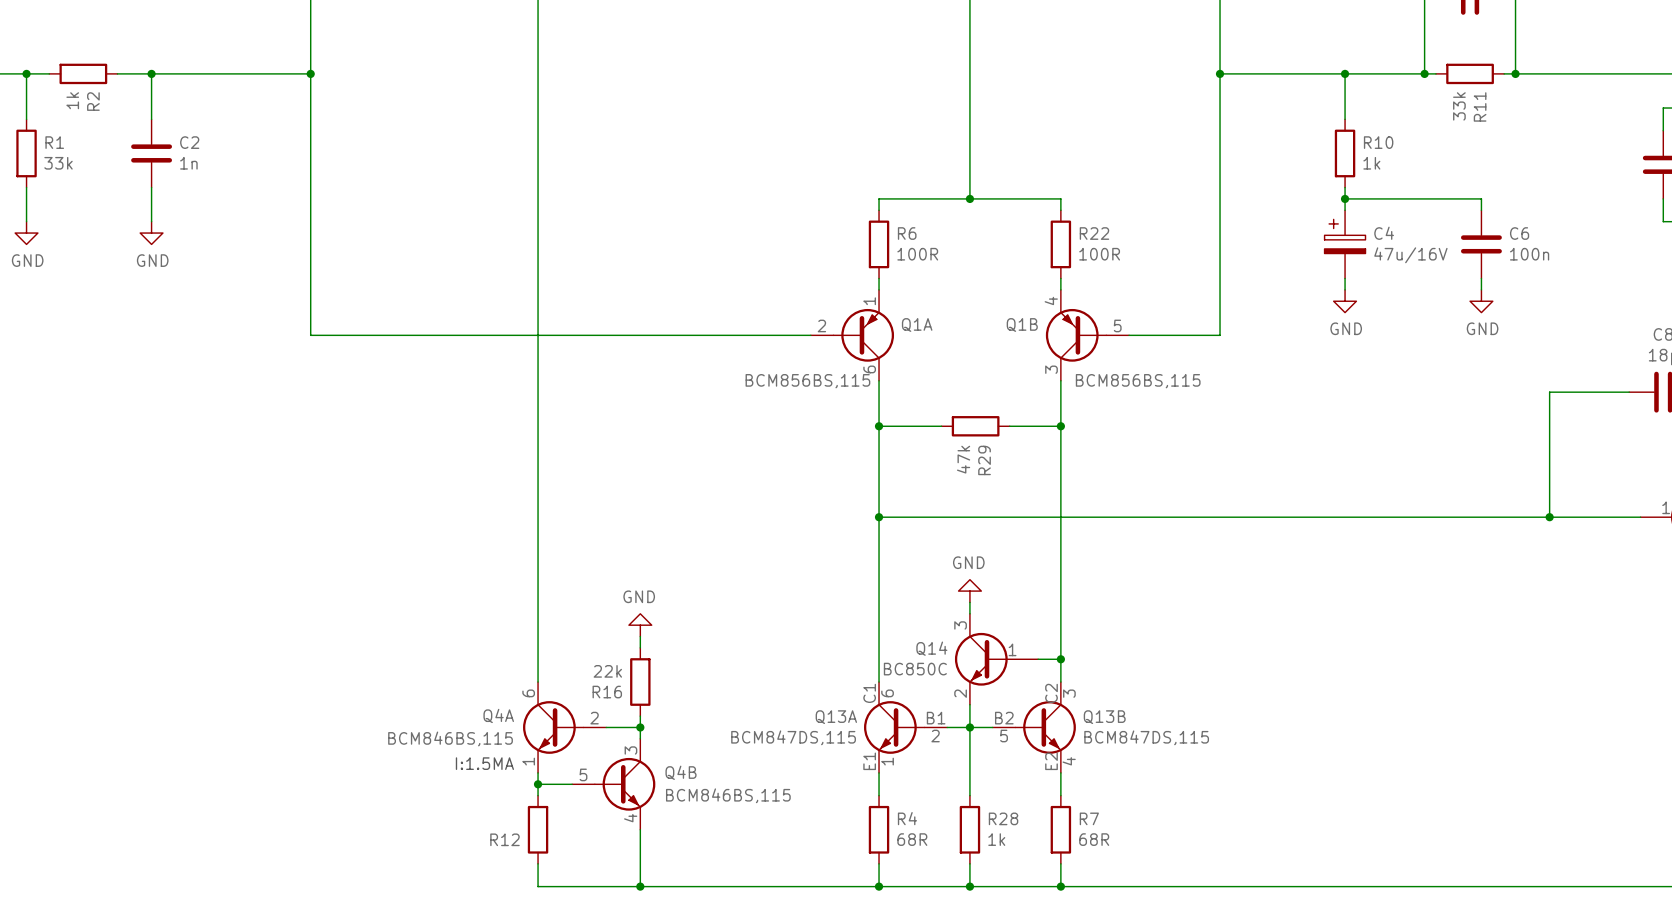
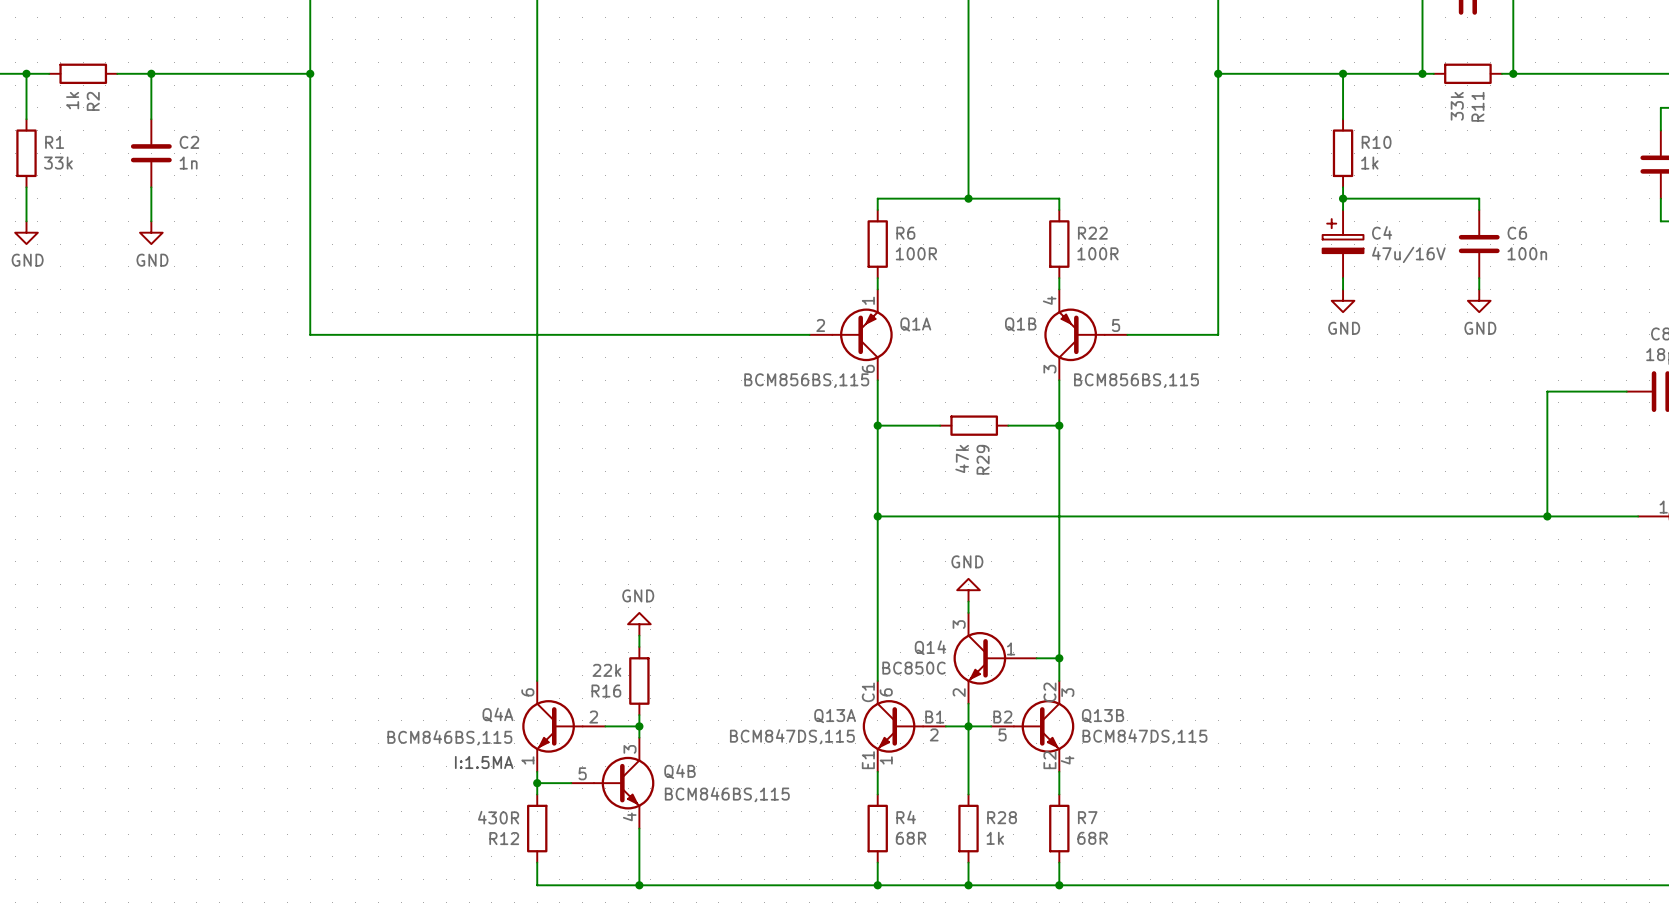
R12 value: none -> 430R (498, 817)

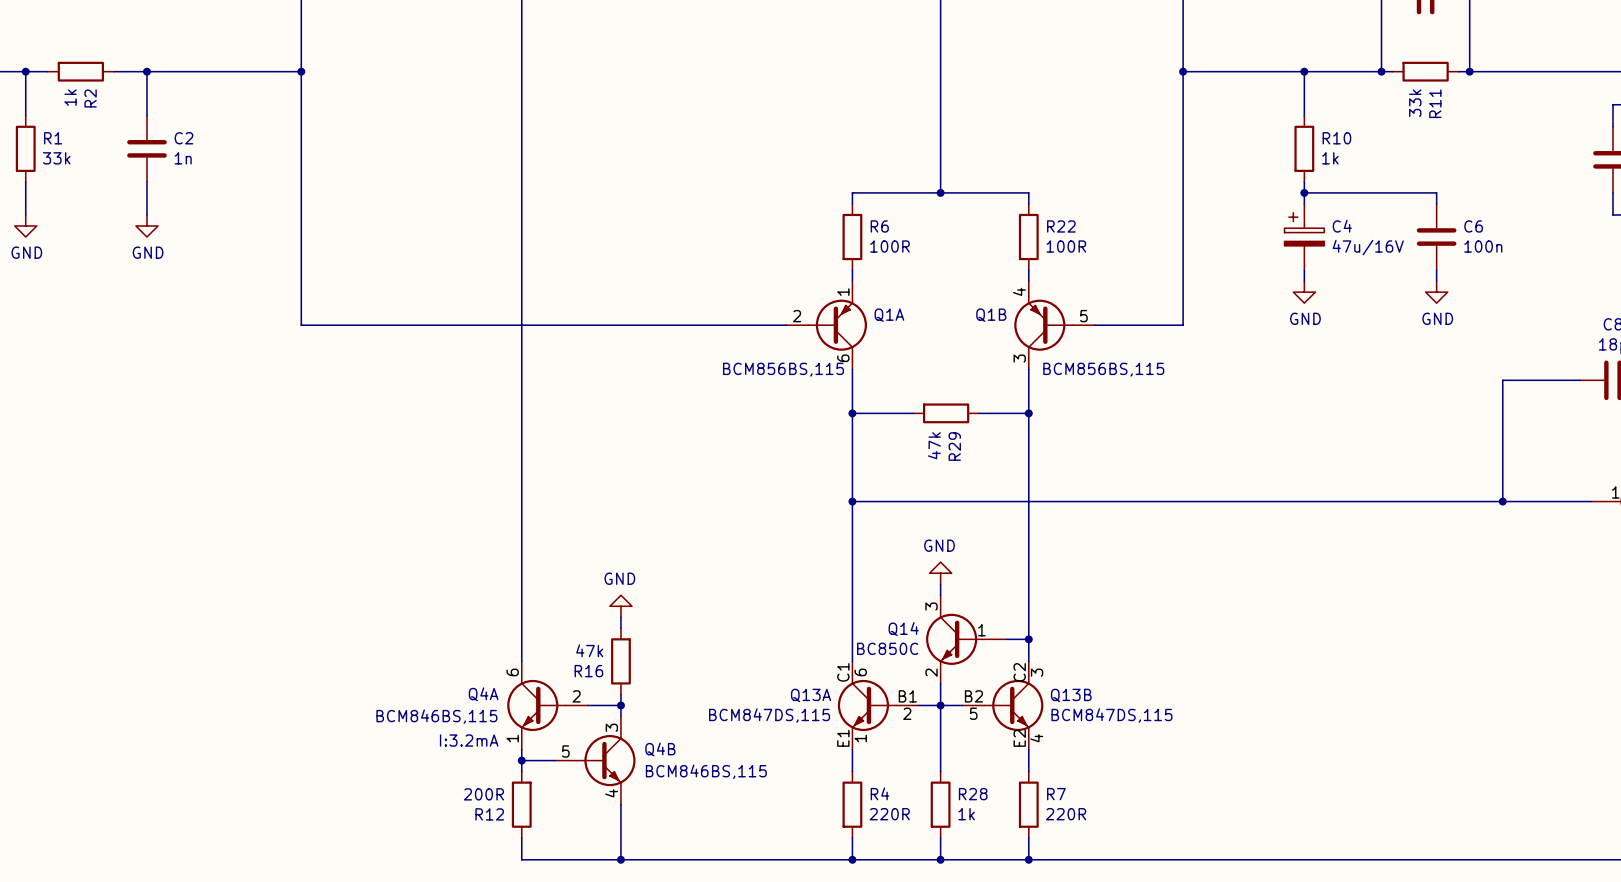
R16 value: 22k (606, 670) -> 47k (589, 650)
text: I:1.5MA (484, 762) -> I:3.2mA (469, 740)
R12 value: 430R (498, 817) -> 200R (483, 794)
R4 value: 68R (910, 838) -> 220R (889, 814)
R7 value: 68R (1092, 838) -> 220R (1066, 814)

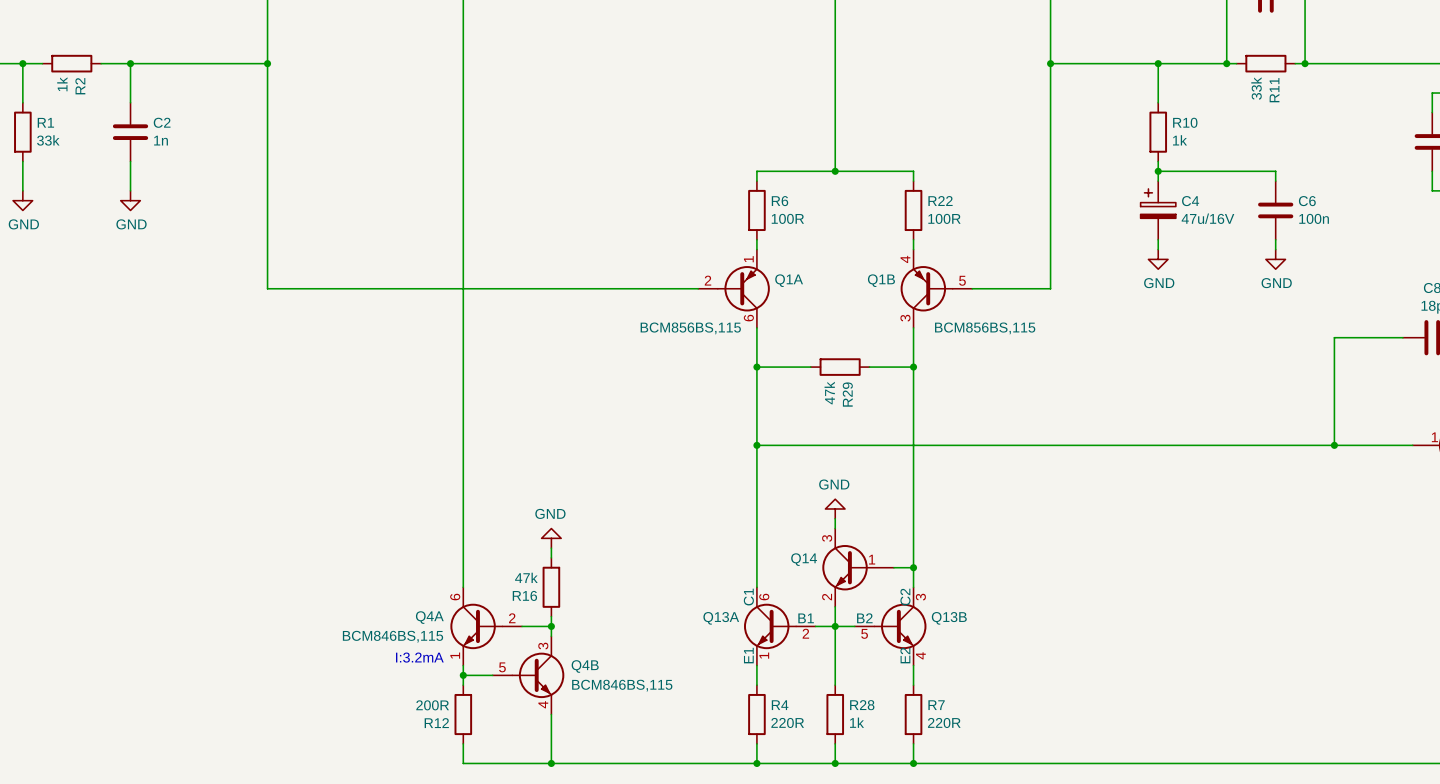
Q14 value: BC850C (887, 648) -> none
Q13A value: BCM847DS,115 (769, 715) -> none
Q13B value: BCM847DS,115 (1111, 715) -> none

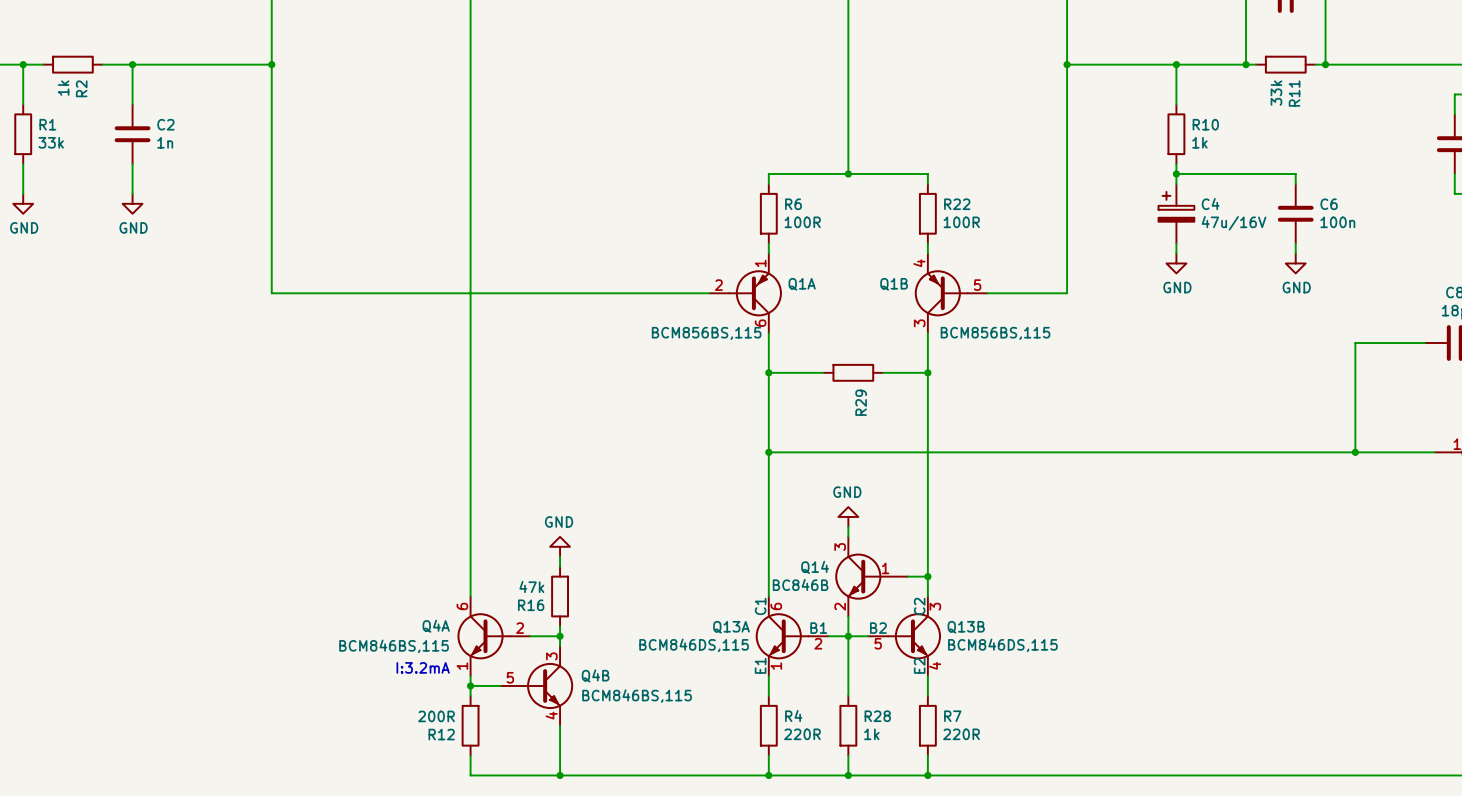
R29 value: 47k (829, 393) -> none
Q14 value: none -> BC846B (800, 584)
Q13A value: none -> BCM846DS,115 (694, 645)
Q13B value: none -> BCM846DS,115 (1002, 645)

